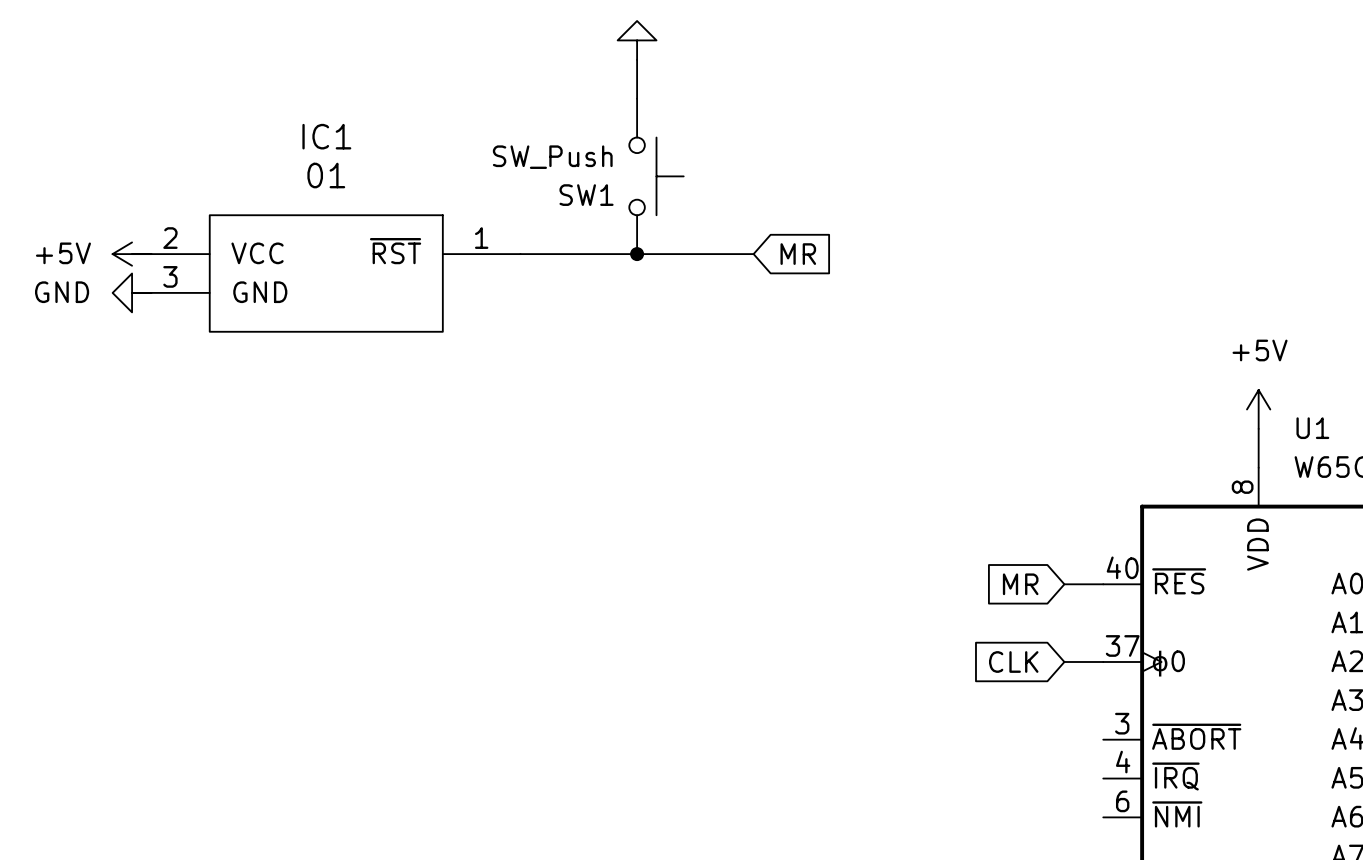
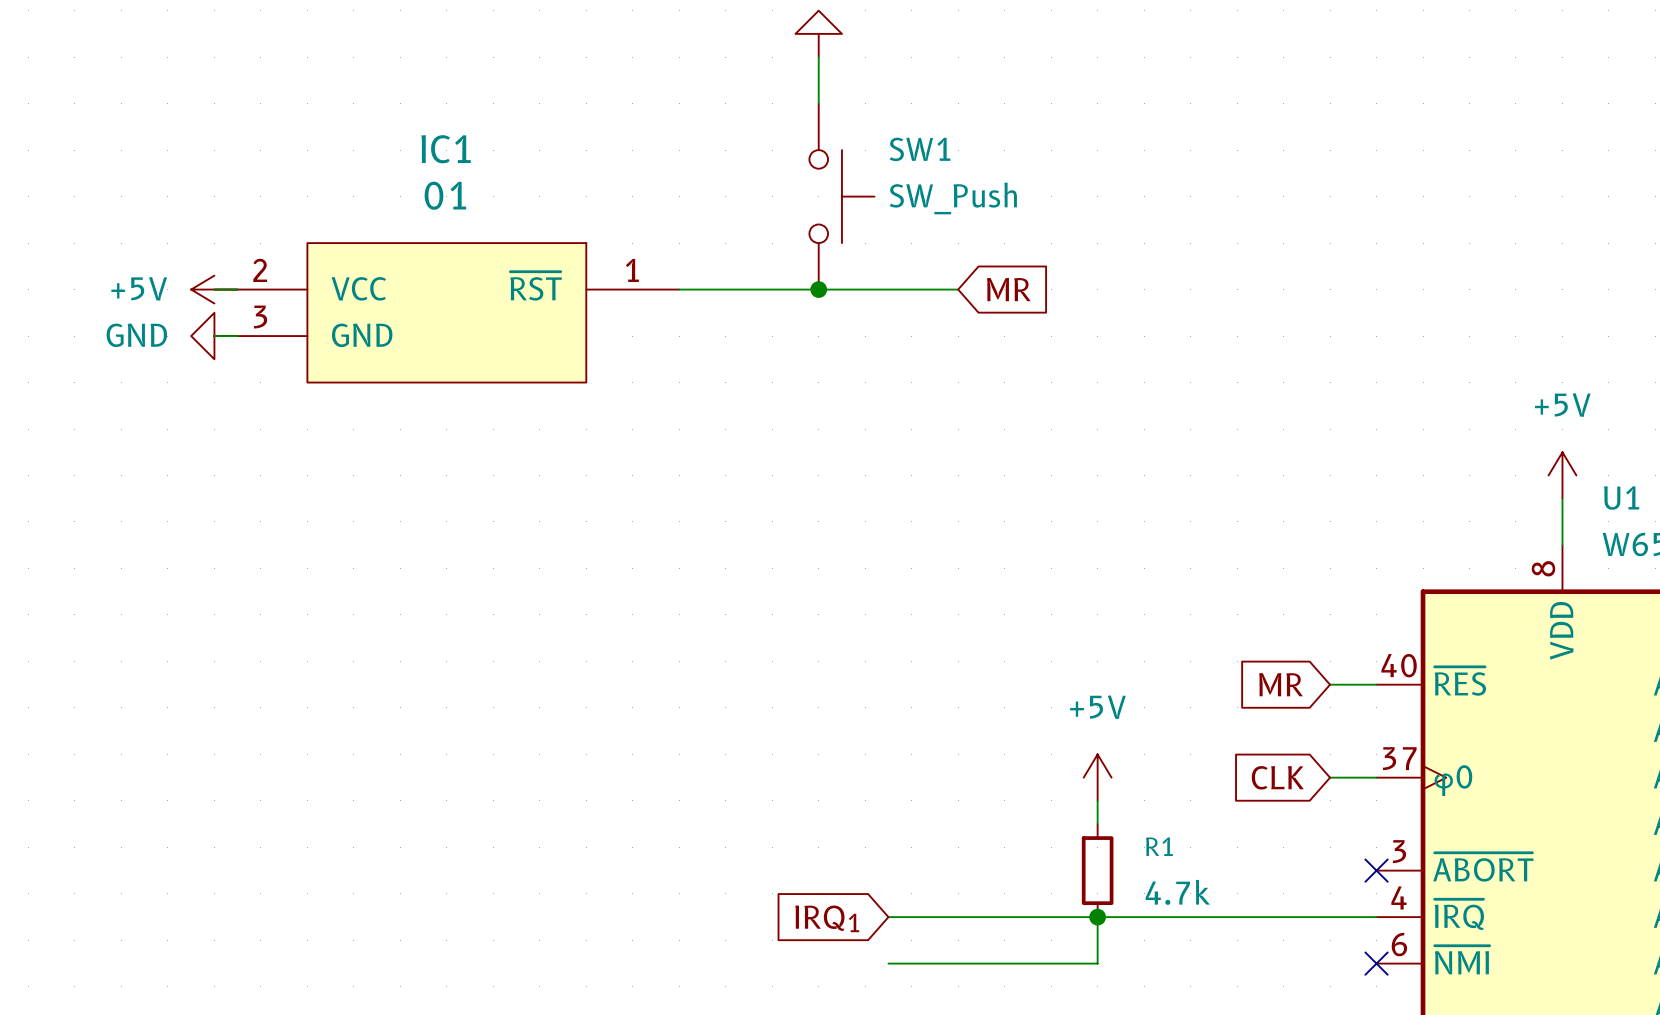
SW1 value position: SW_Push (552, 157) -> SW_Push (953, 198)
SW1 name position: SW1 (586, 195) -> SW1 (920, 149)
power symbol: none -> +5V (1097, 777)
wire: none -> (1097, 800) (1097, 824)
R1: none -> 4.7k (1097, 870)
no-connect mark: none -> (1376, 870)
wire: none -> (888, 917) (1376, 917)
wire: none -> (1097, 917) (1097, 963) (888, 963)
junction: none -> (1097, 917)
global label: none -> IRQ1 (827, 918)
no-connect mark: none -> (1376, 963)

